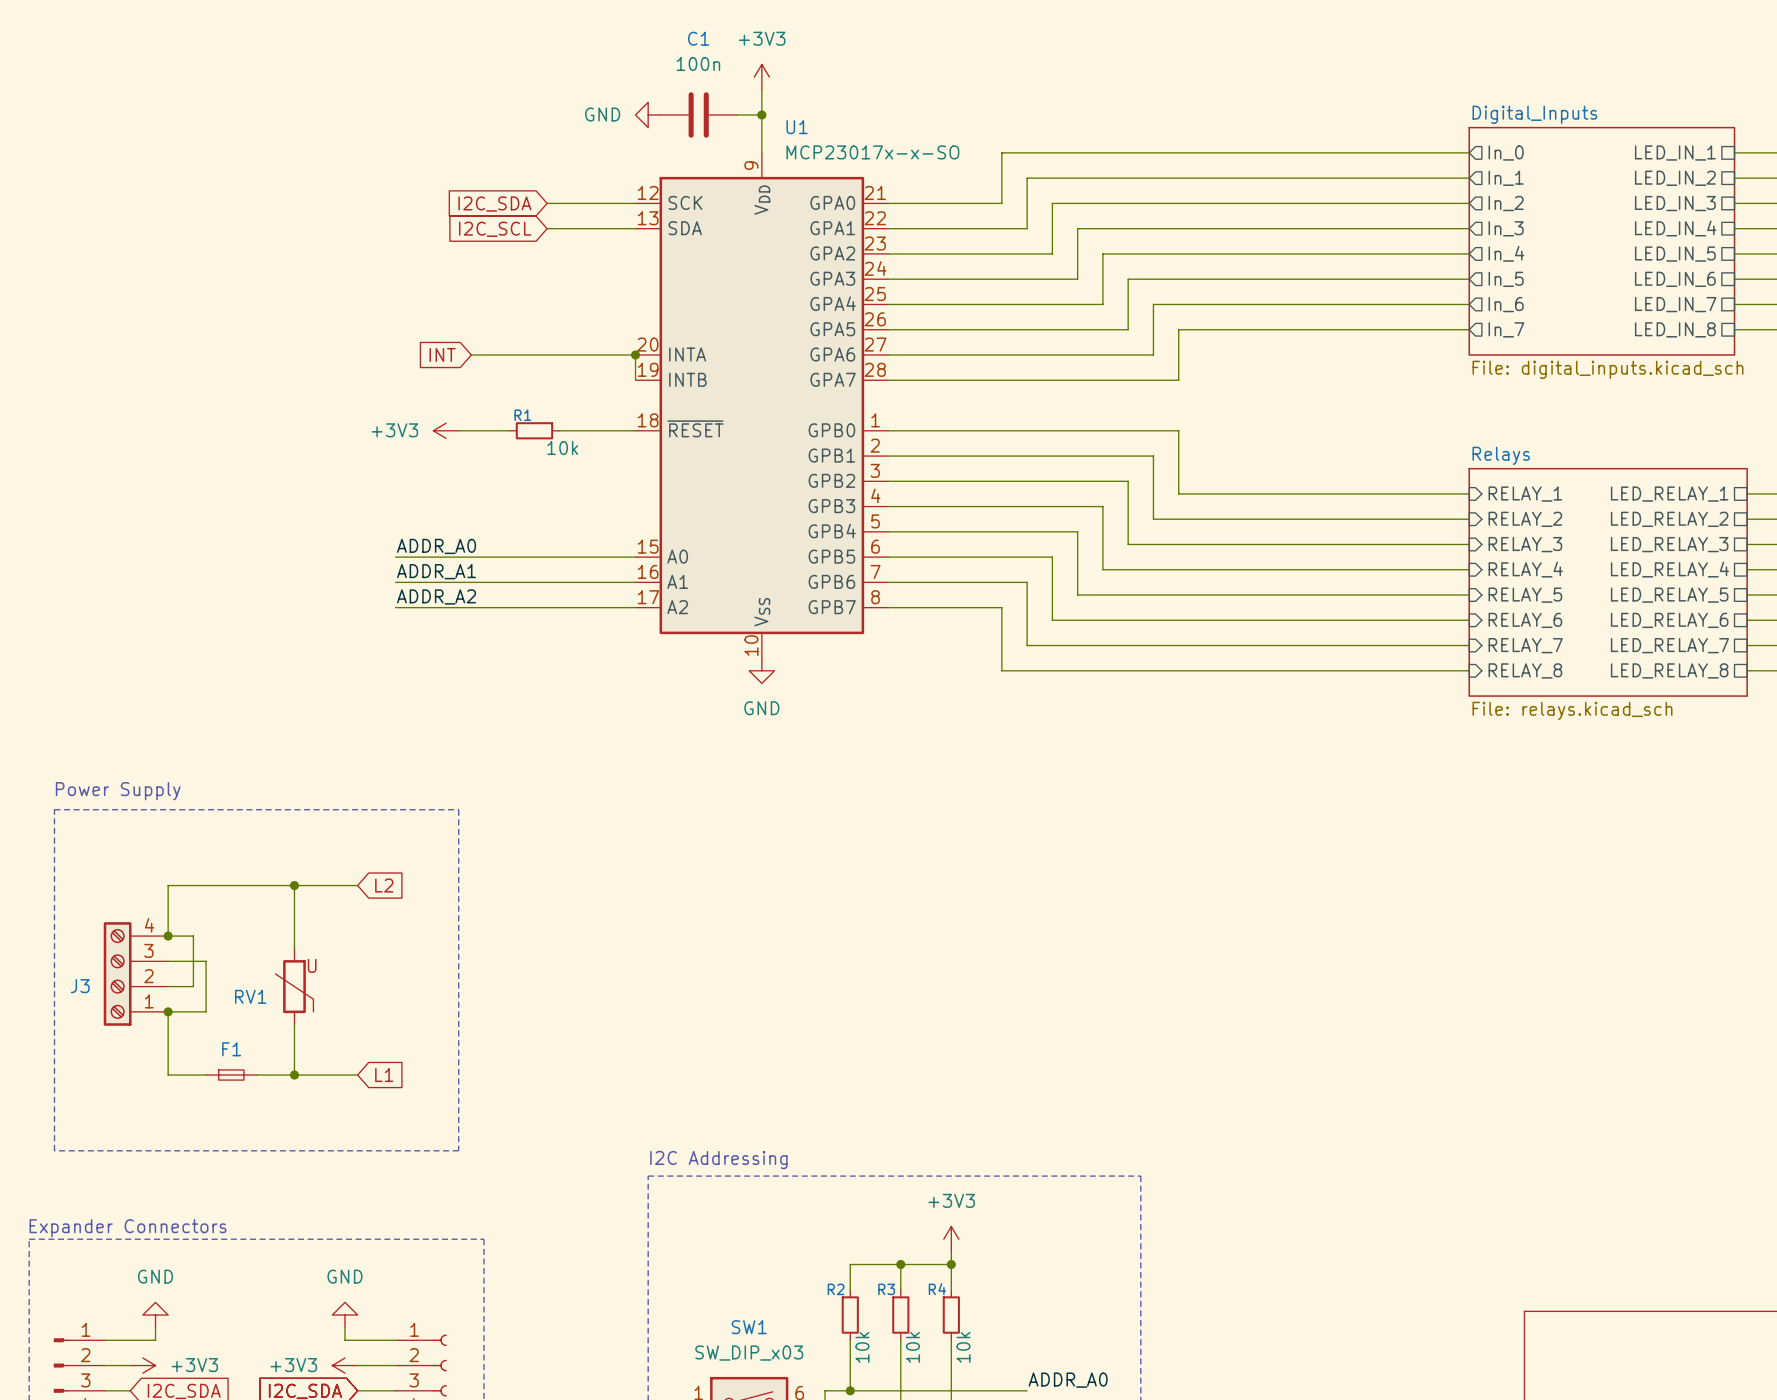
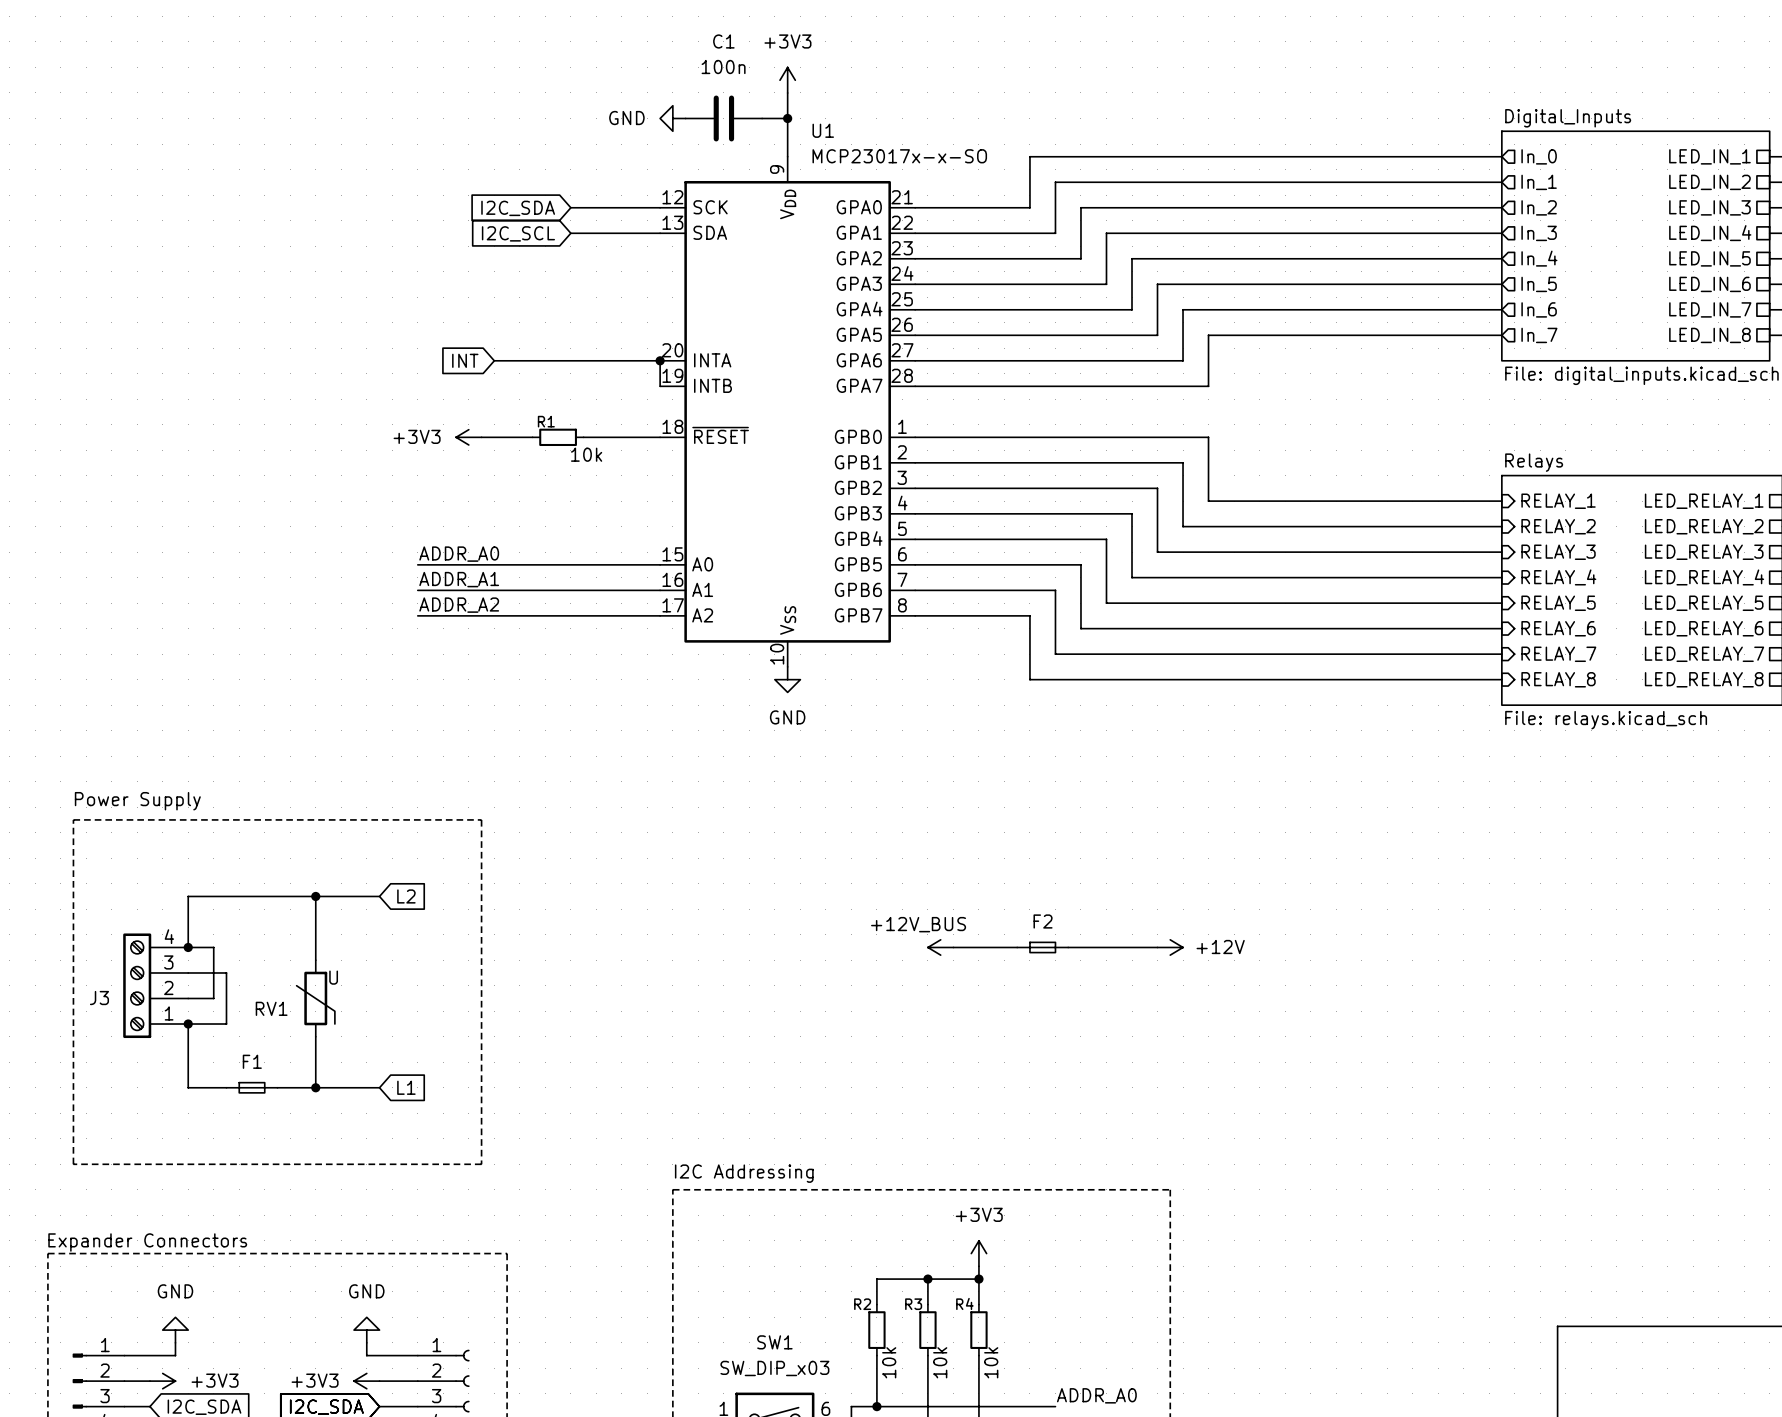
power symbol: none -> +12V_BUS (940, 947)
wire: none -> (953, 947) (1017, 947)
F2: none -> (1042, 947)
wire: none -> (1068, 947) (1157, 947)
power symbol: none -> +12V (1170, 947)

